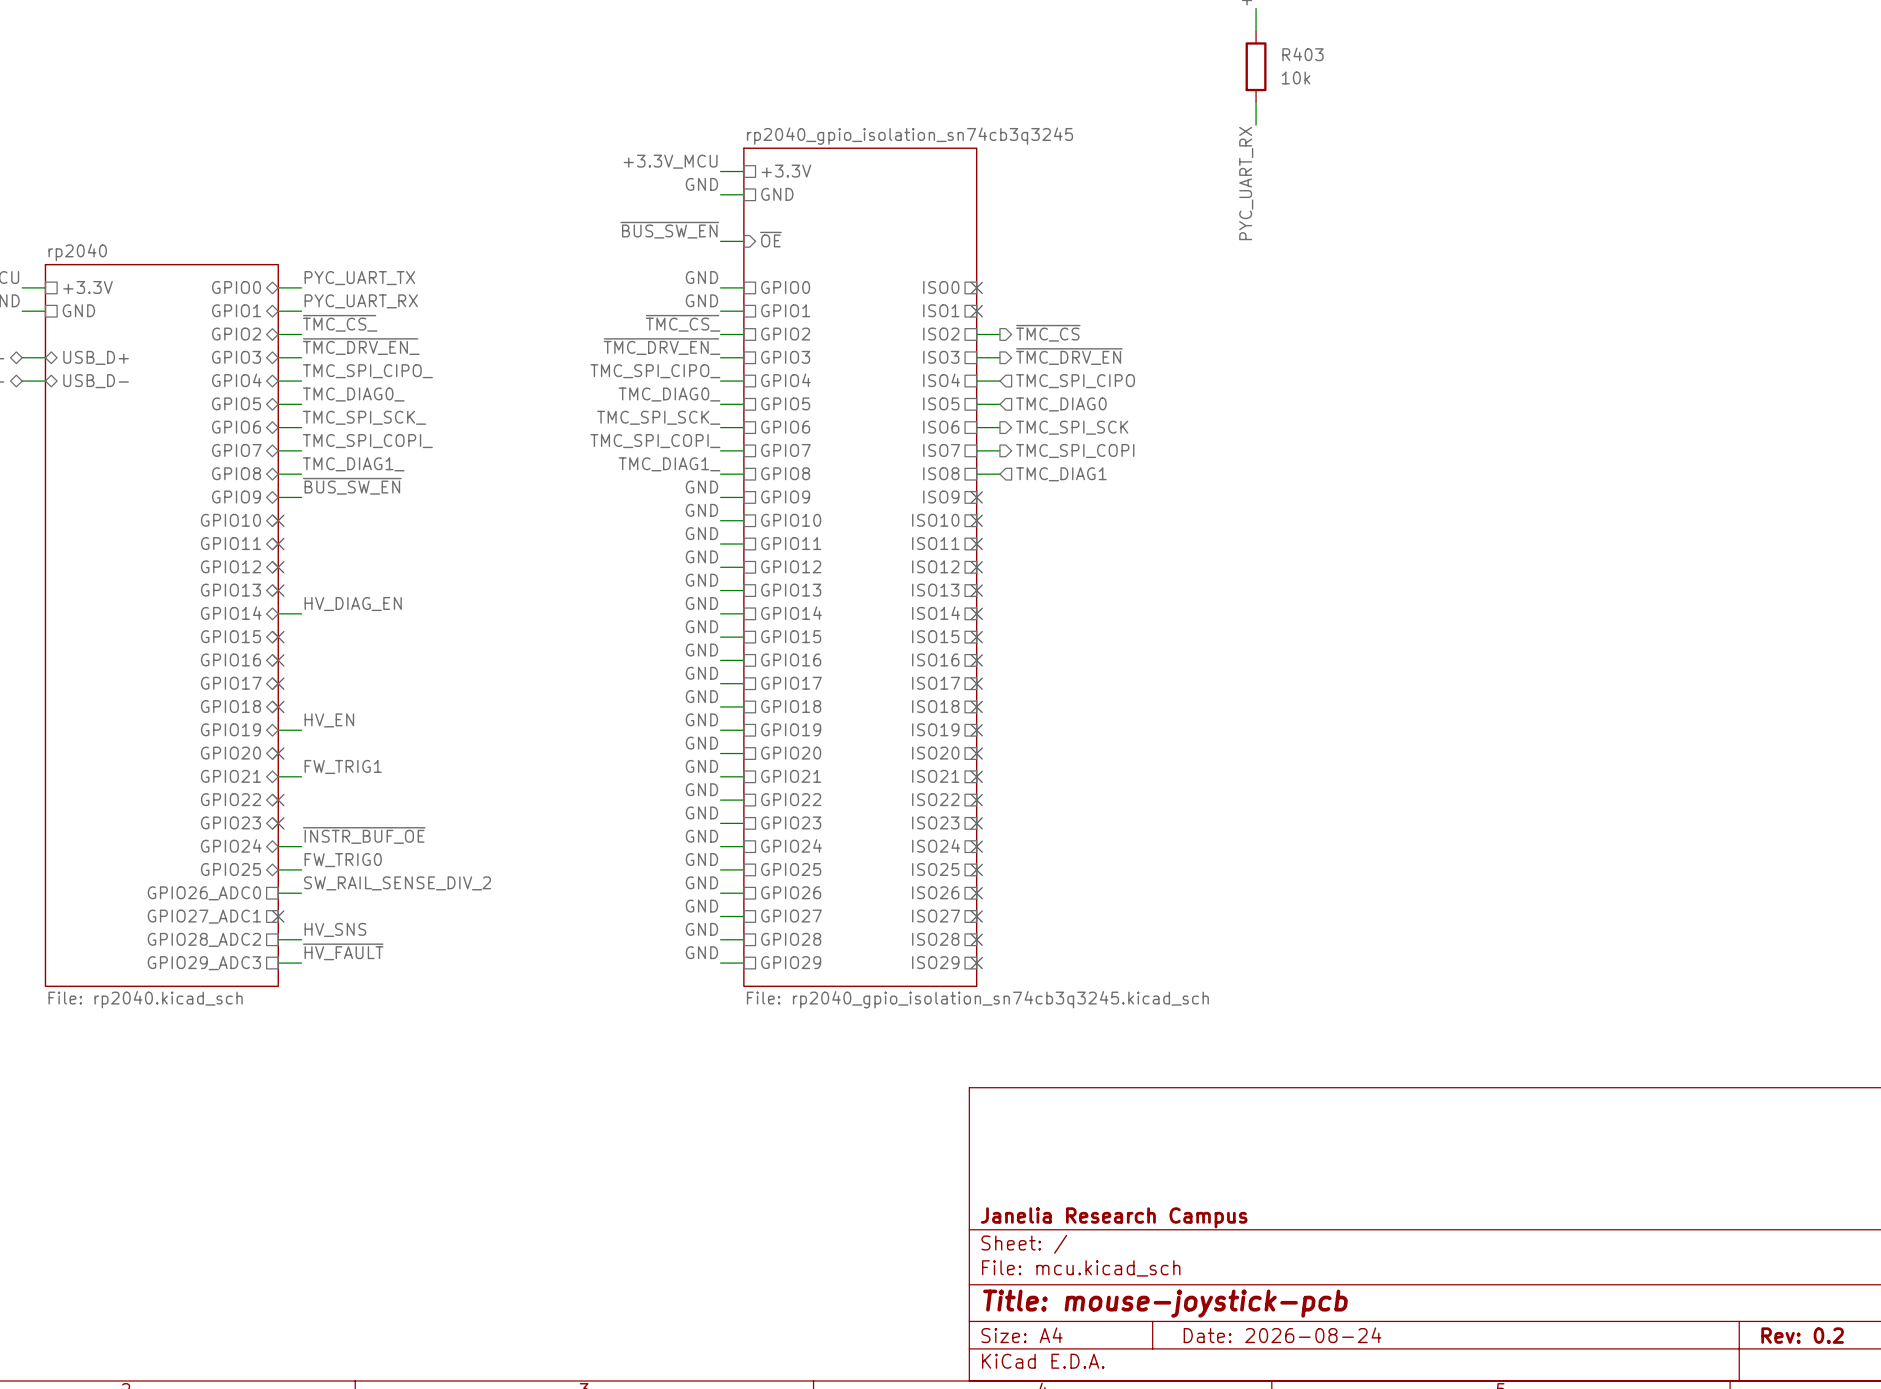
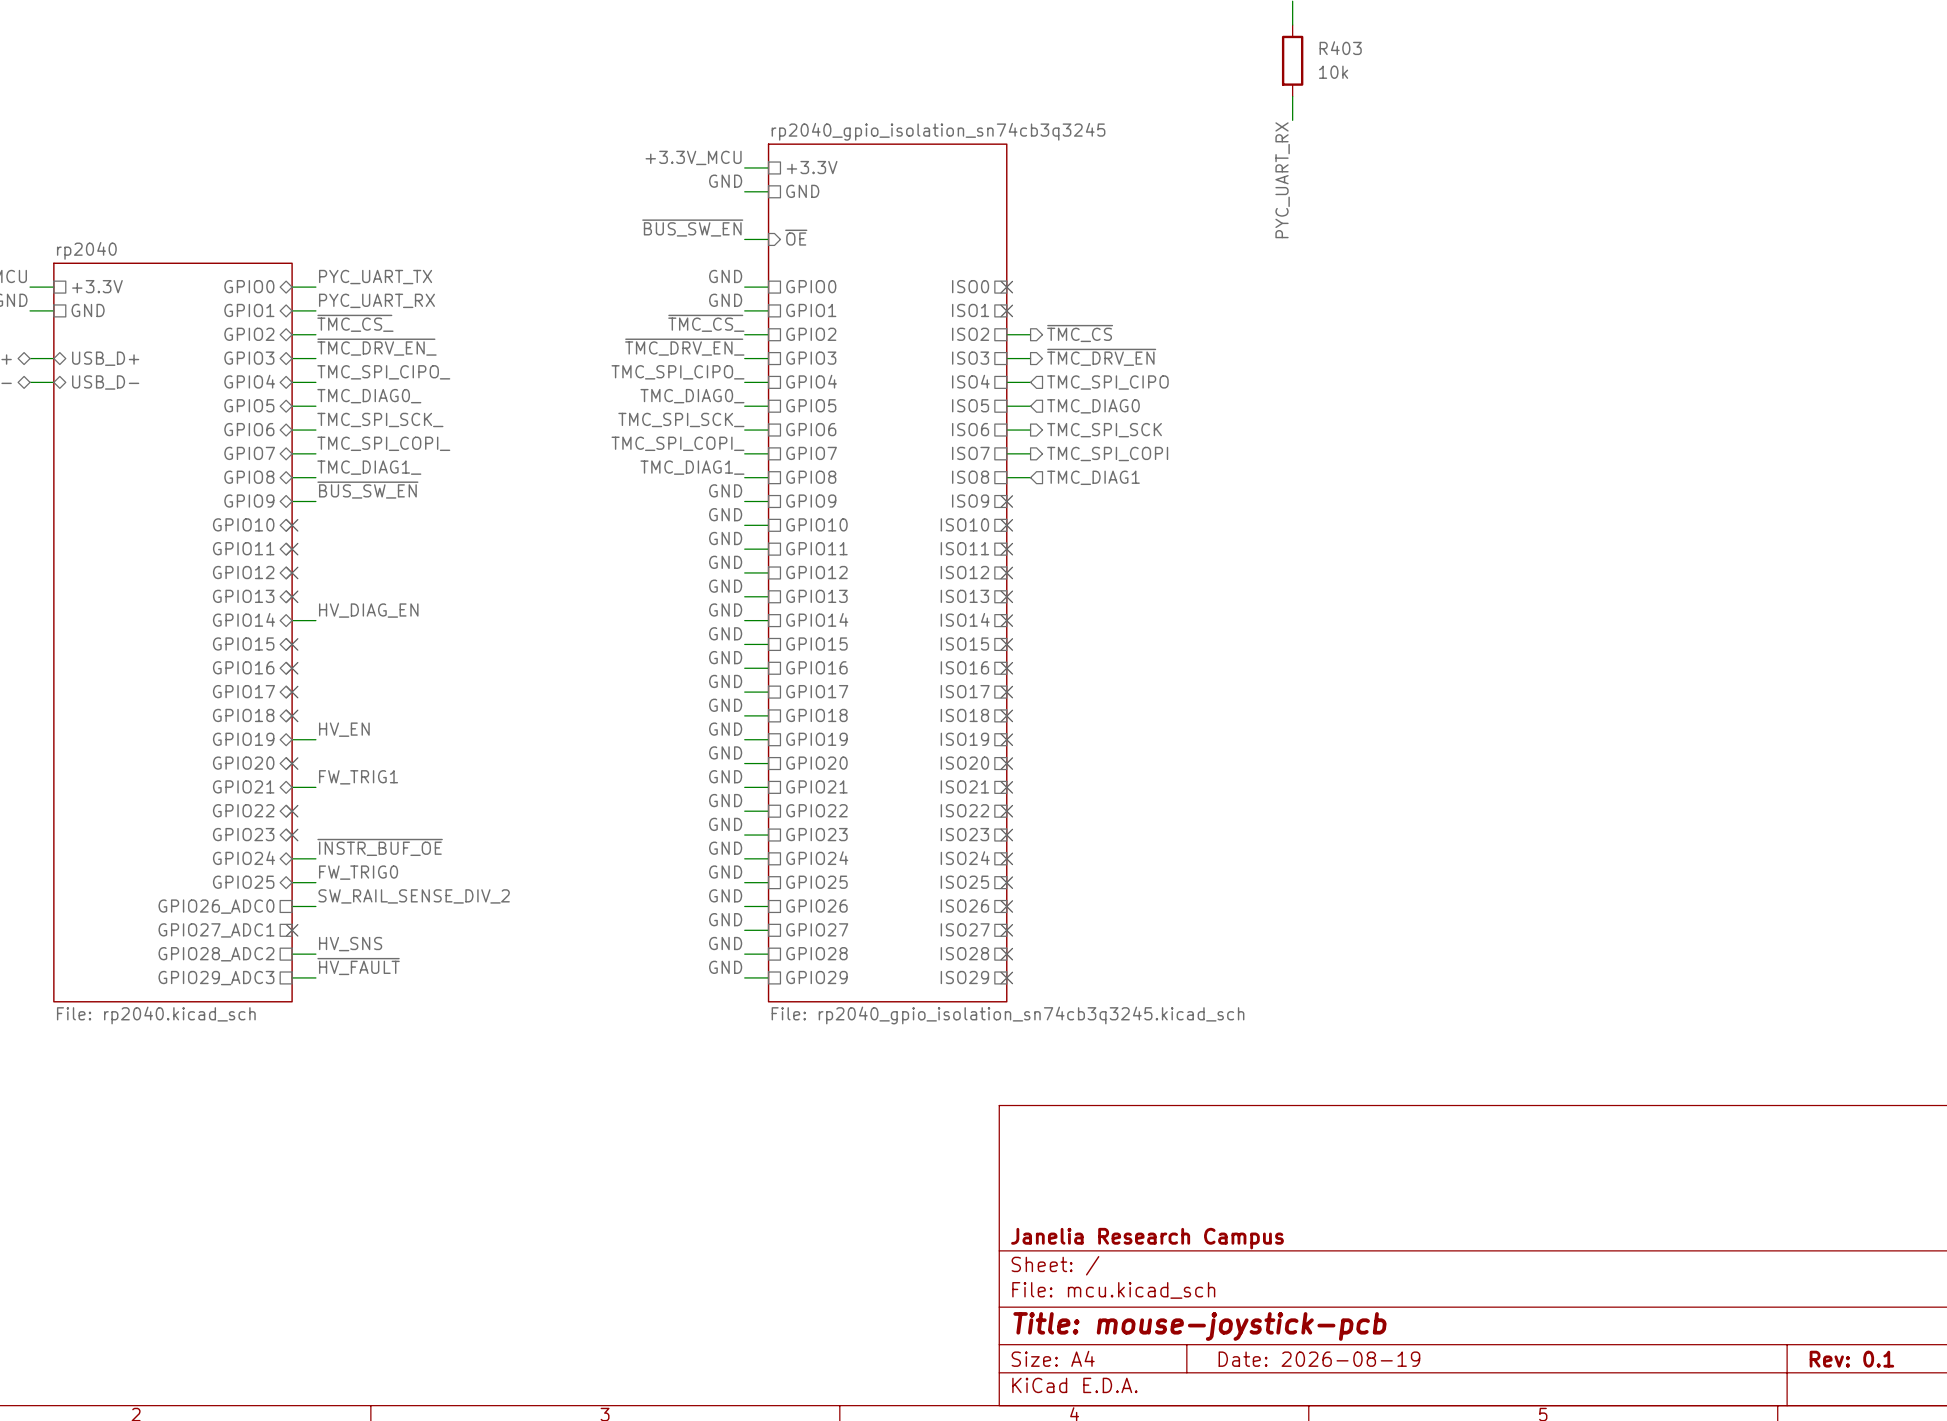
title block: Date: 2026-08-24 (1282, 1335) -> Date: 2026-08-19 (1319, 1359)
title block: Rev: 0.2 (1802, 1335) -> Rev: 0.1 (1851, 1359)

